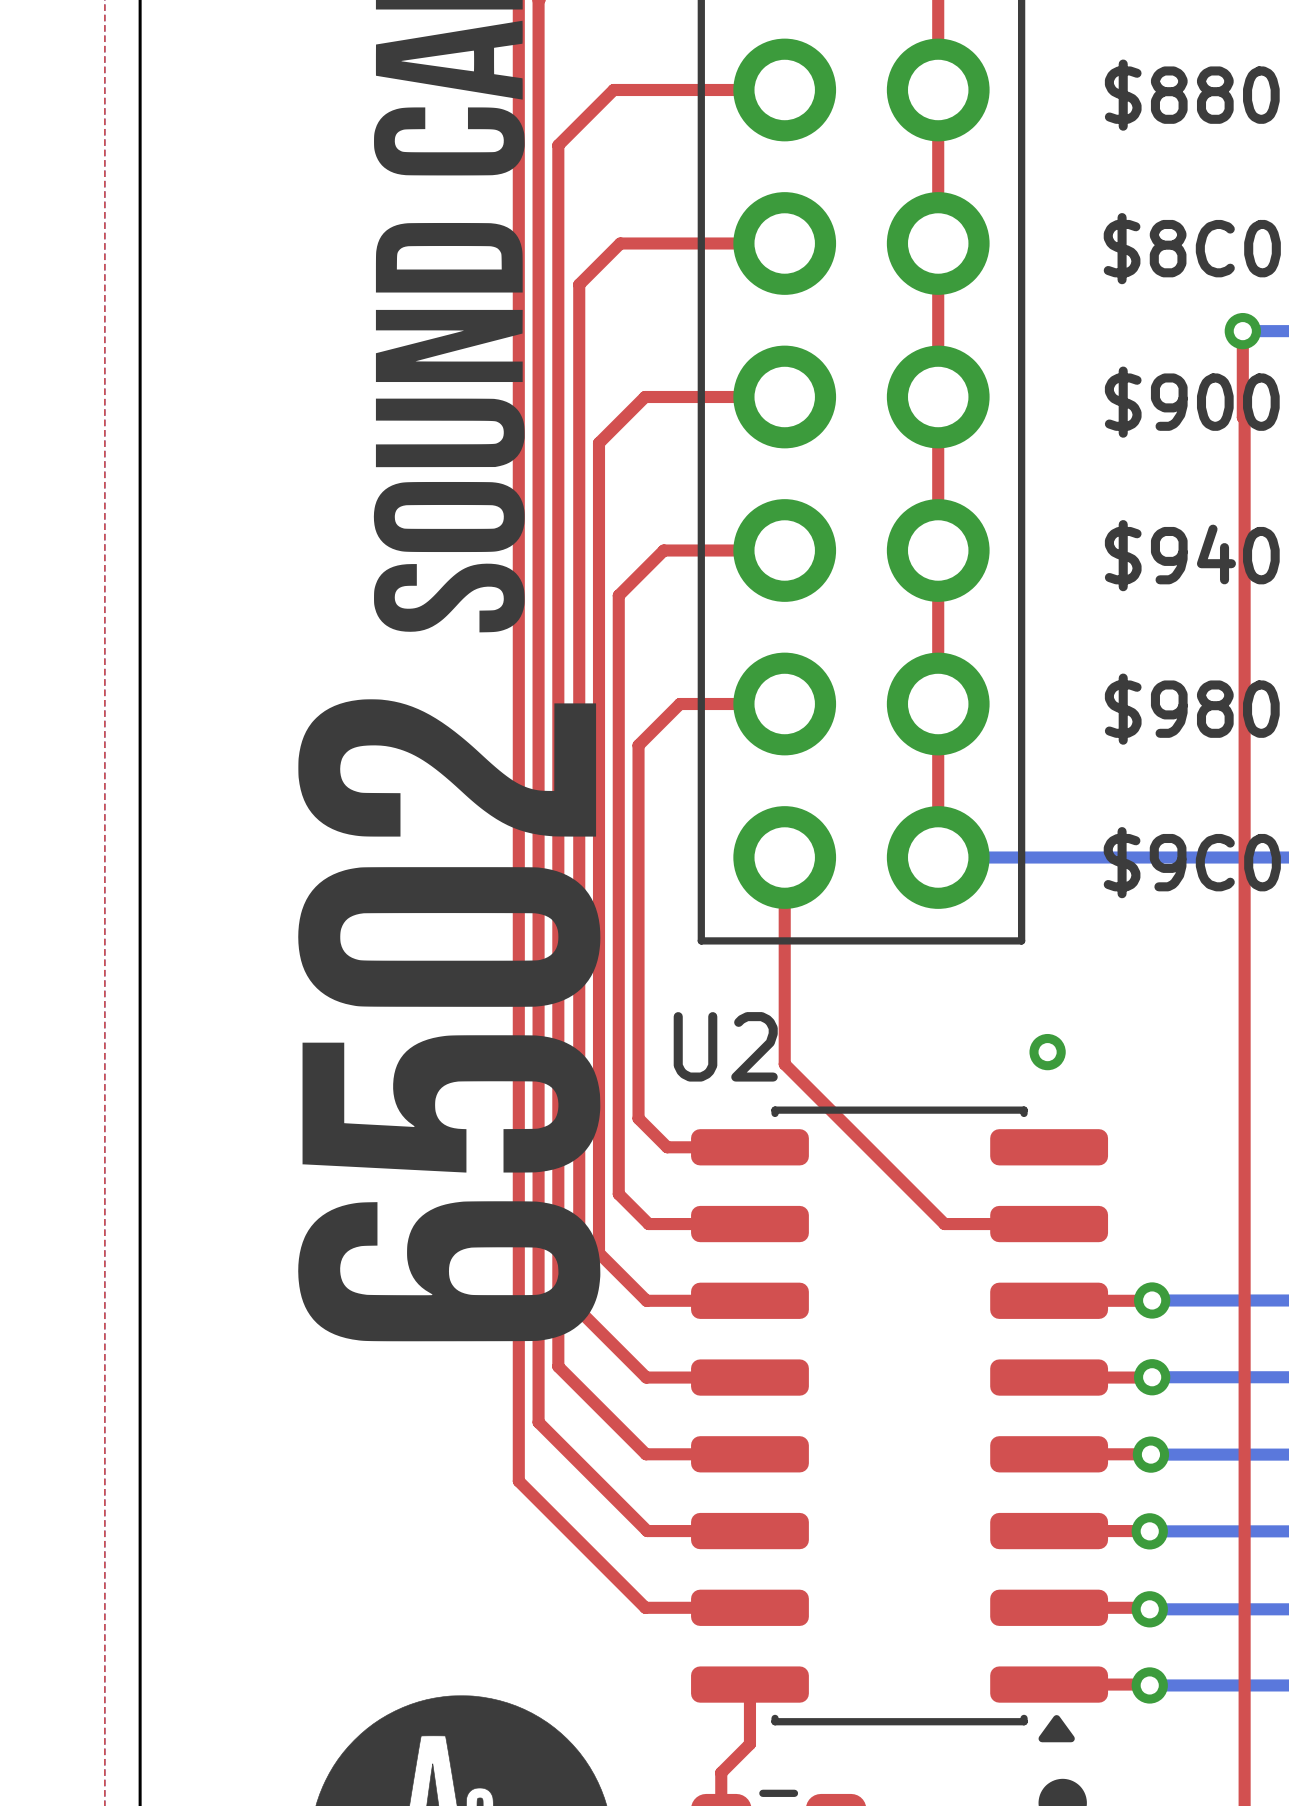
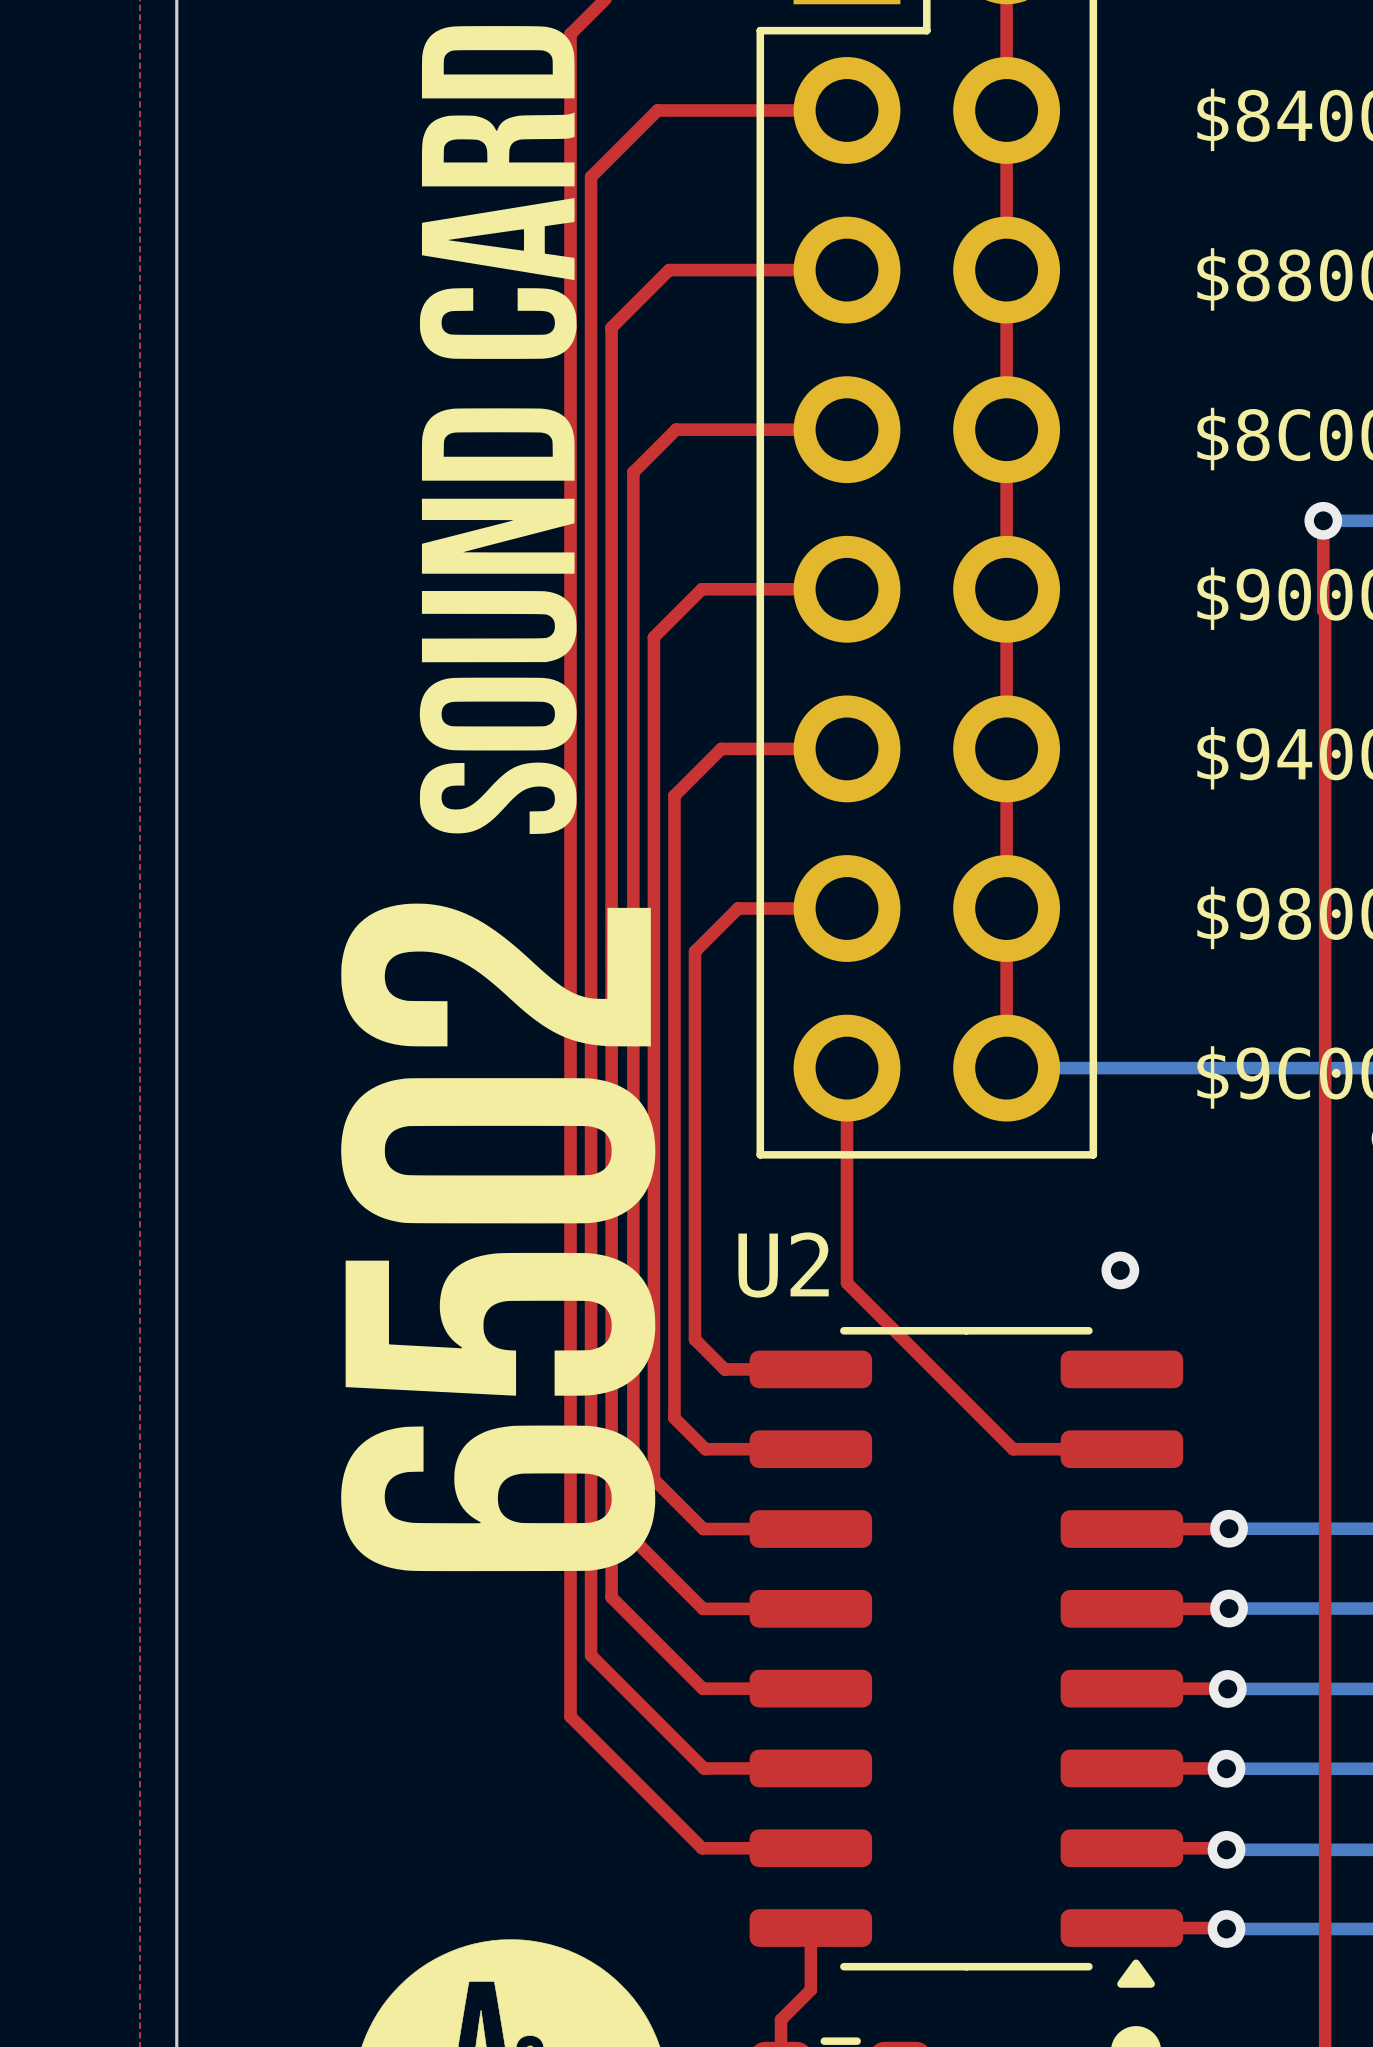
U2 footprint: [691, 1106, 1109, 1743] -> [749, 1327, 1184, 1988]

